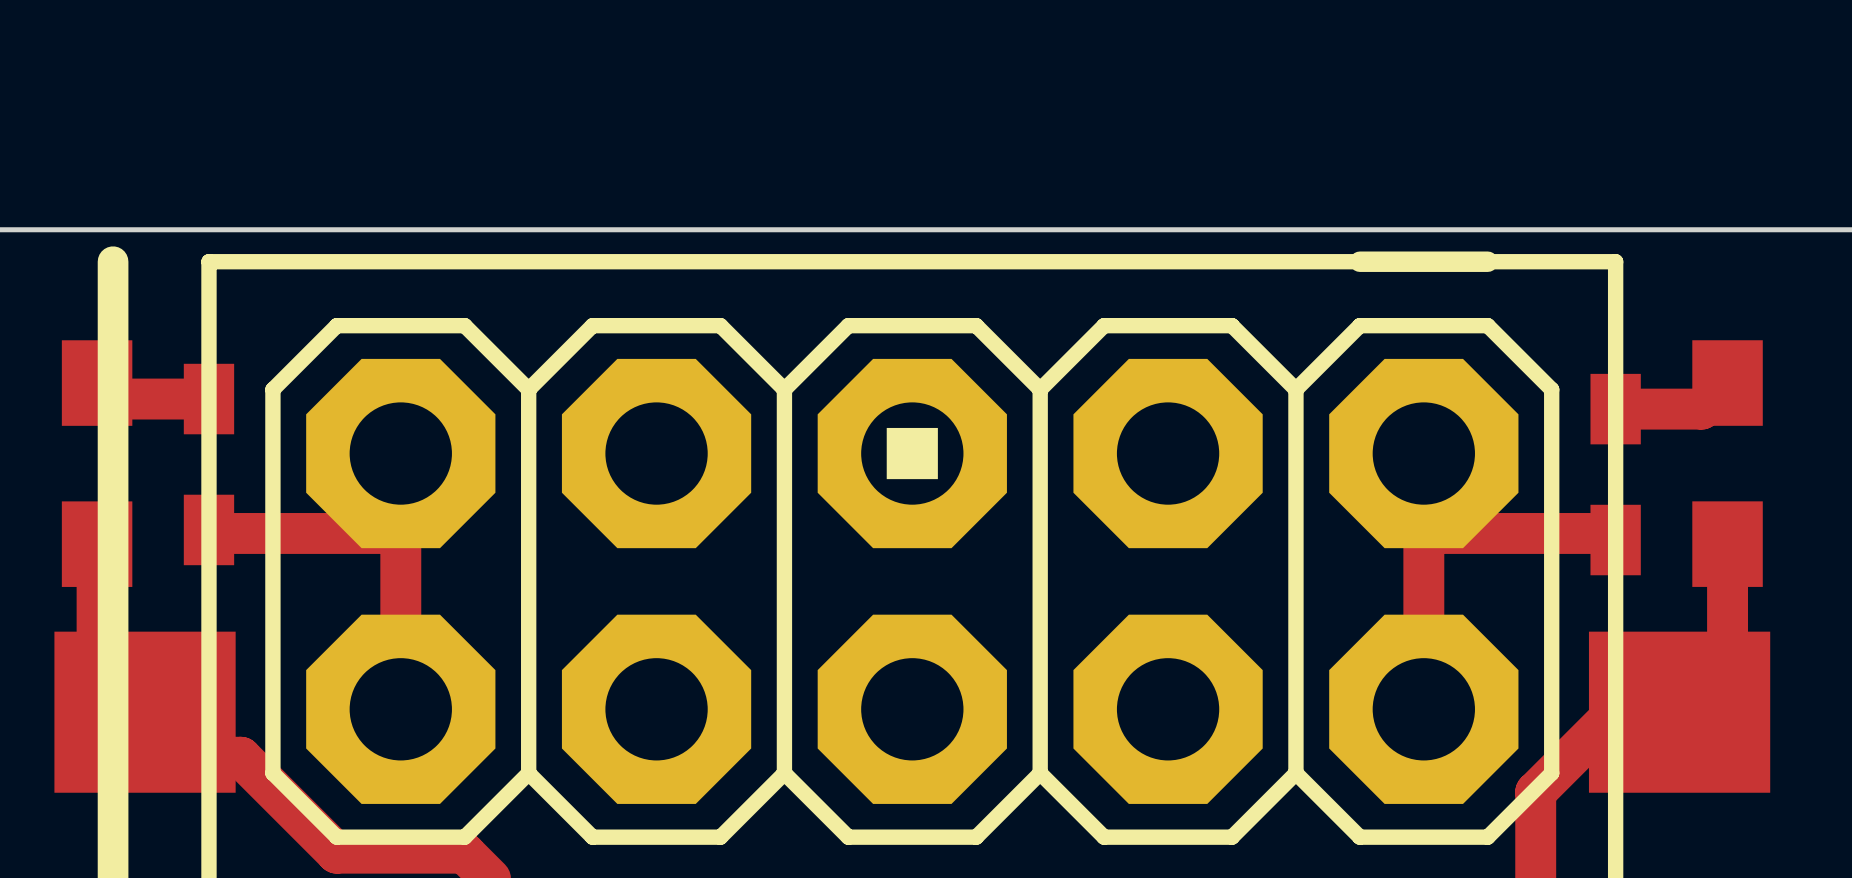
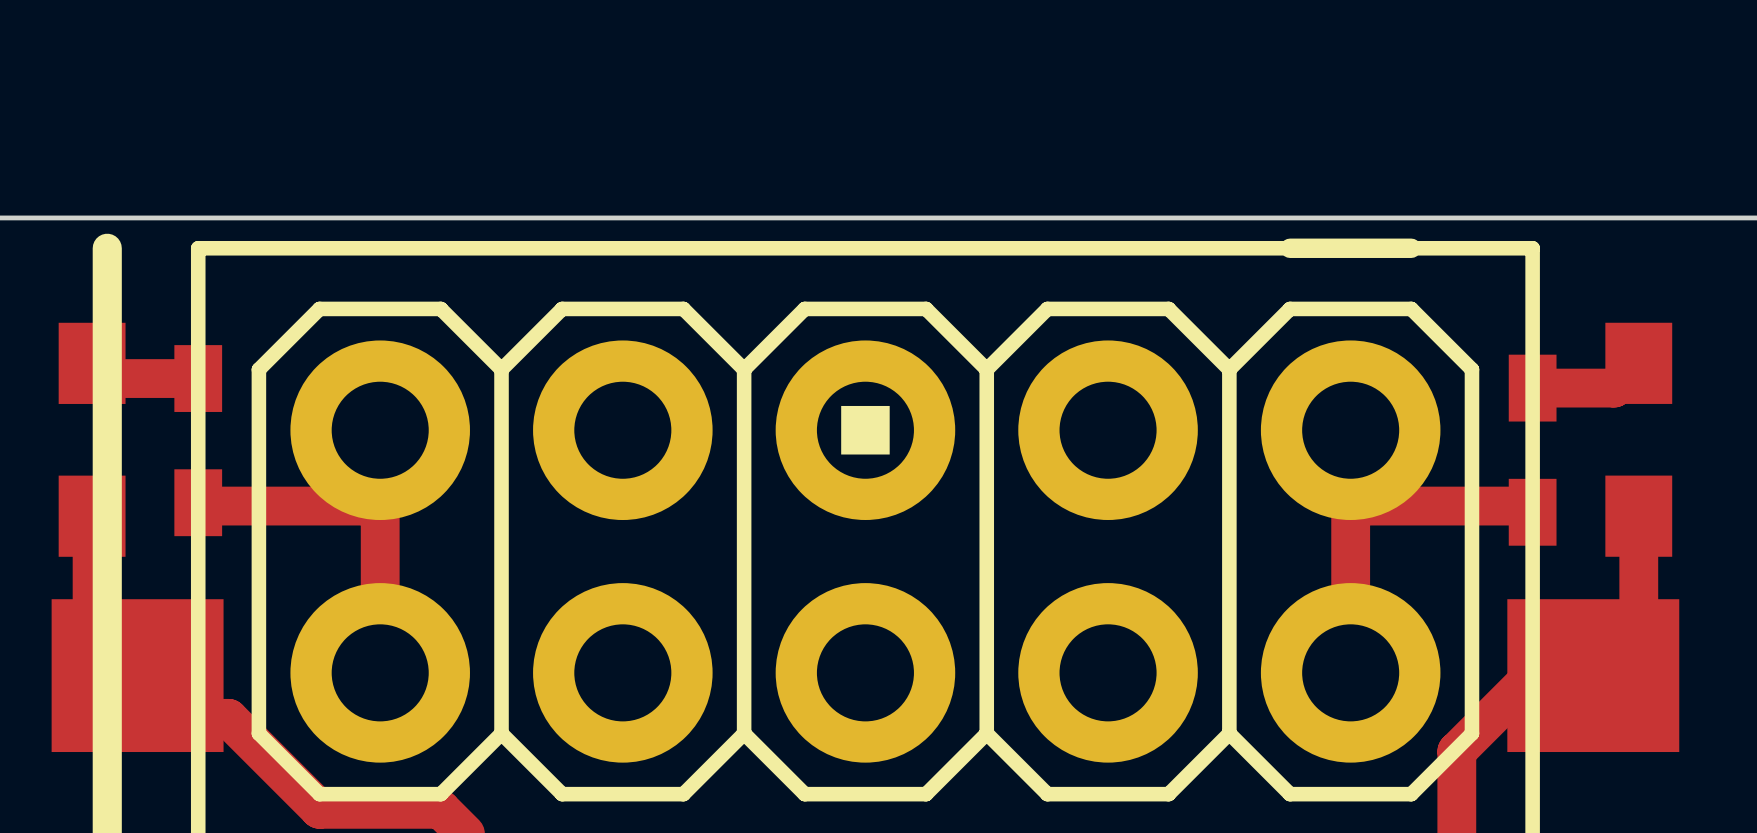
part footprint: [265, 251, 1560, 845] -> [251, 238, 1480, 802]

